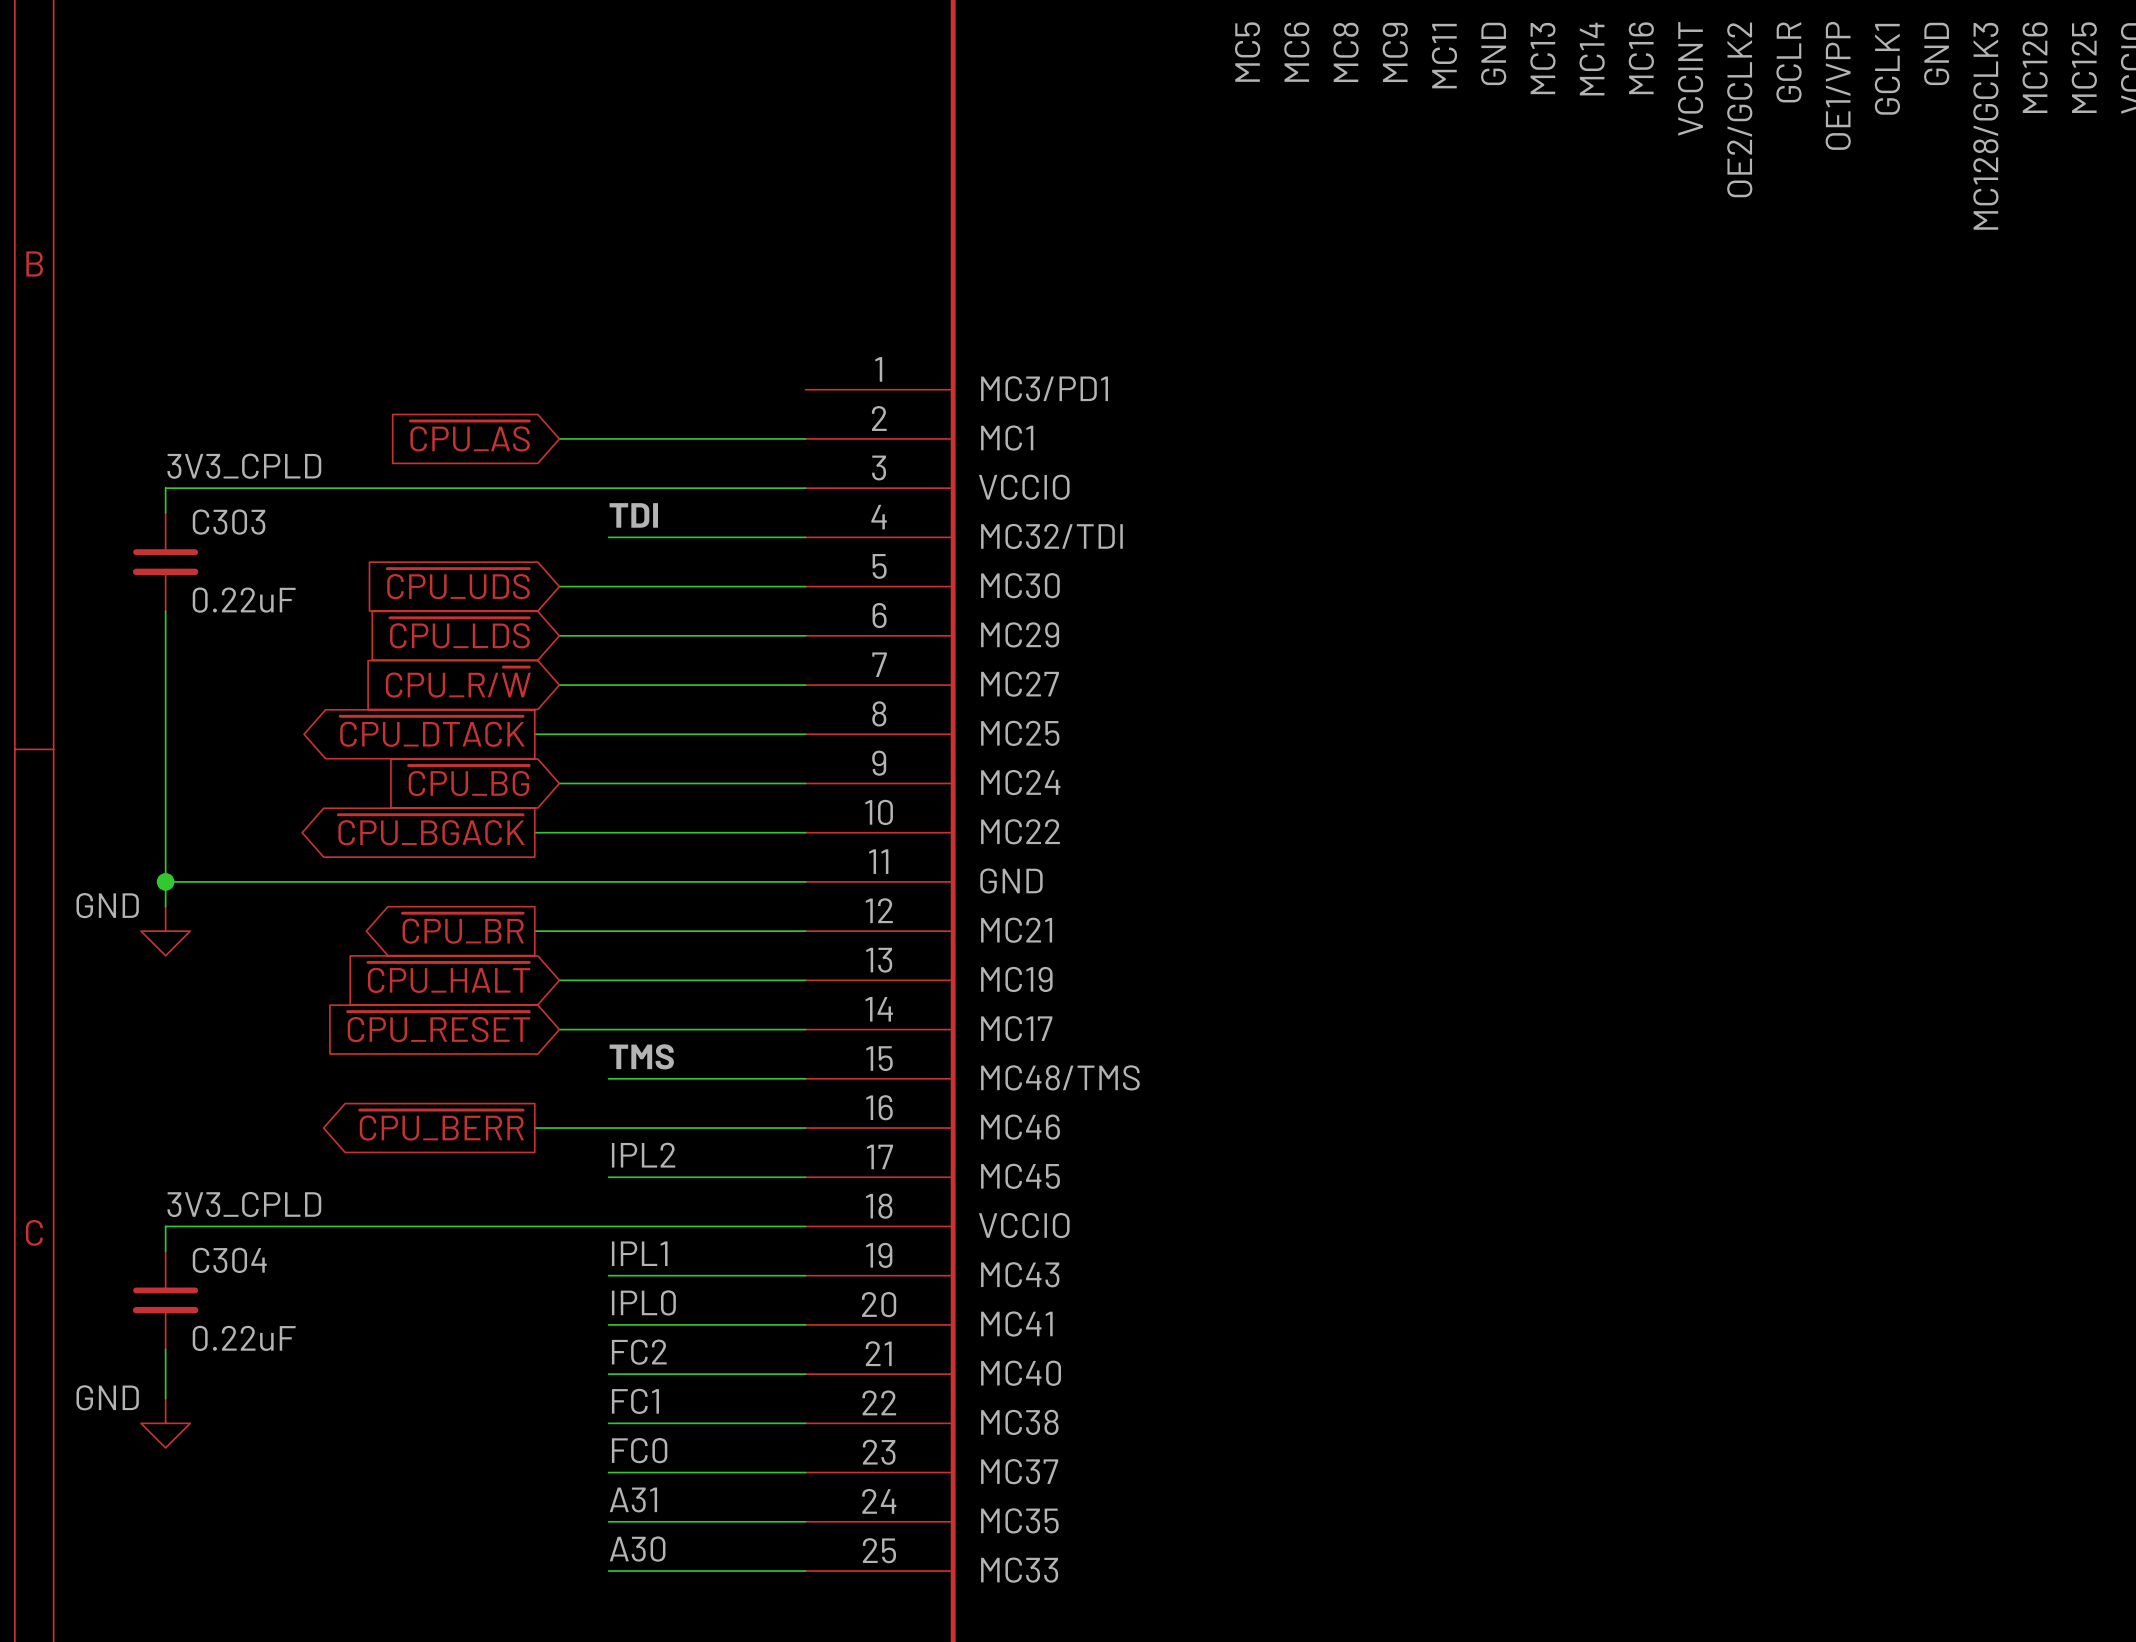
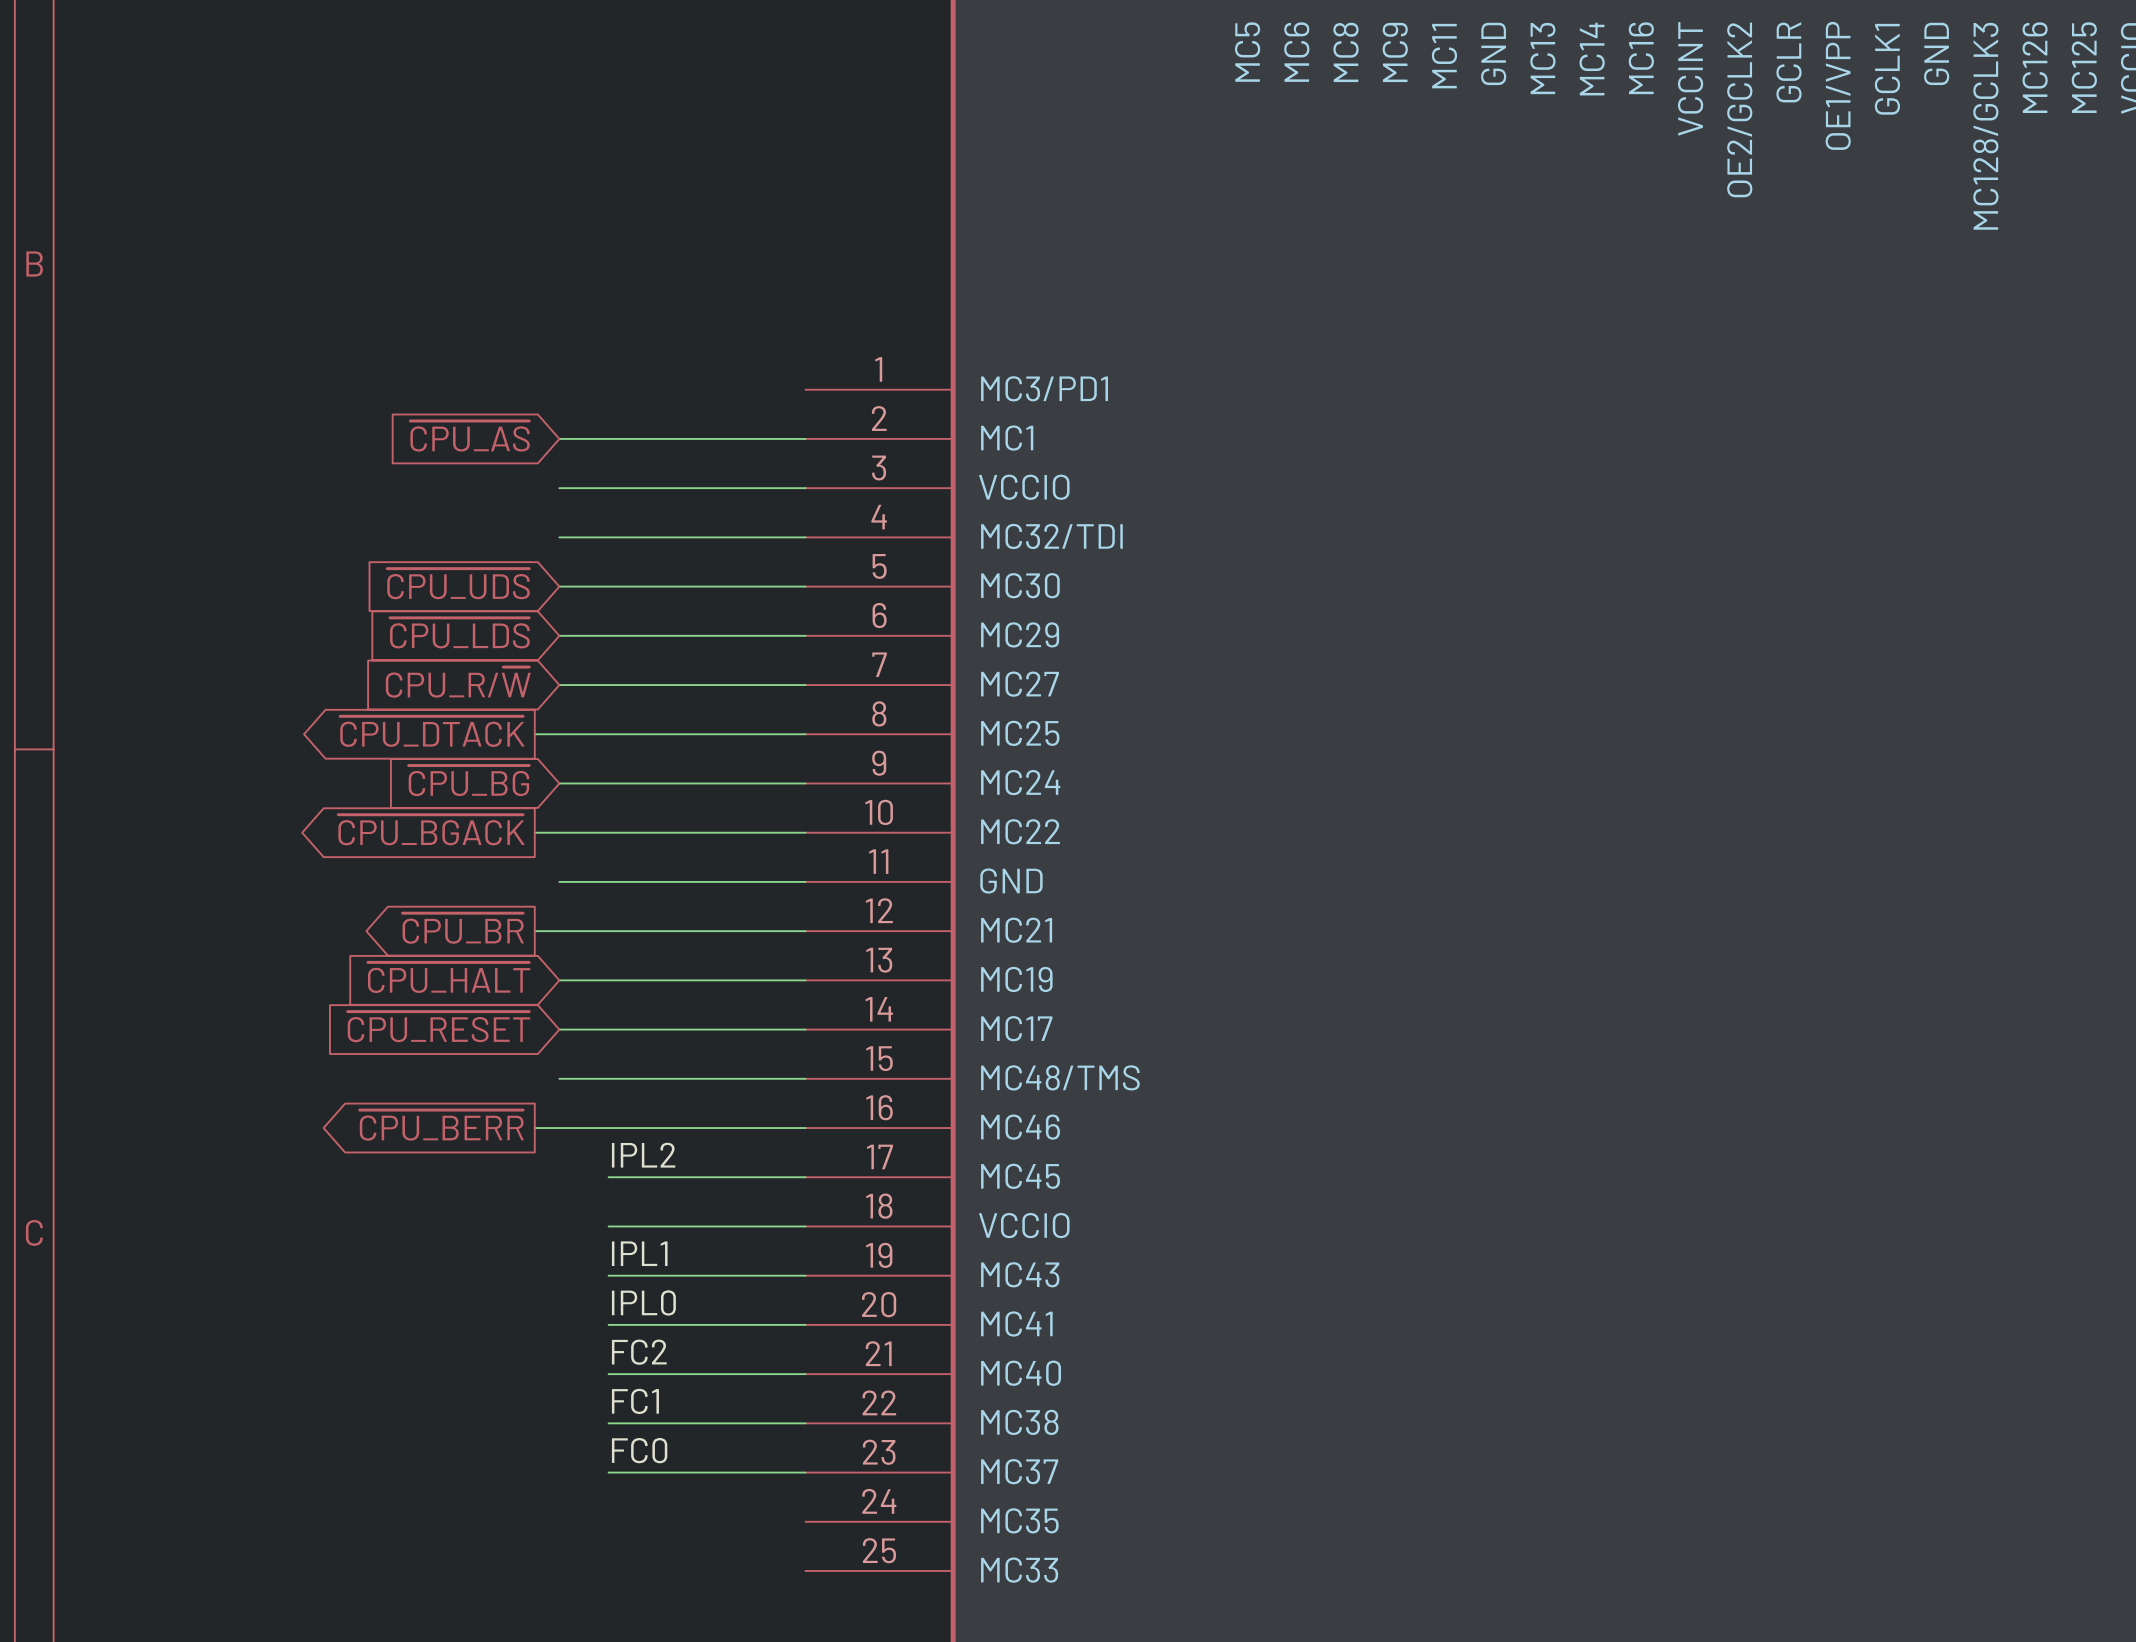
label: 3V3_CPLD (244, 466) -> none
wire: (559, 488) (165, 488) (165, 512) -> none
label: TDI (633, 515) -> none
wire: none -> (559, 537) (608, 537)
C303: 0.22uF (165, 561) -> none
wire: (165, 611) (165, 906) -> none
wire: (165, 881) (559, 881) -> none
junction: (165, 881) -> none
power symbol: GND (165, 931) -> none
label: TMS (641, 1056) -> none
wire: none -> (559, 1078) (608, 1078)
label: 3V3_CPLD (244, 1204) -> none
wire: (608, 1226) (165, 1226) (165, 1251) -> none
C304: 0.22uF (165, 1300) -> none
wire: (165, 1349) (165, 1398) -> none
power symbol: GND (165, 1423) -> none
label: A31 (633, 1499) -> none
wire: (608, 1521) (805, 1521) -> none
label: A30 (637, 1549) -> none
wire: (608, 1571) (805, 1571) -> none

